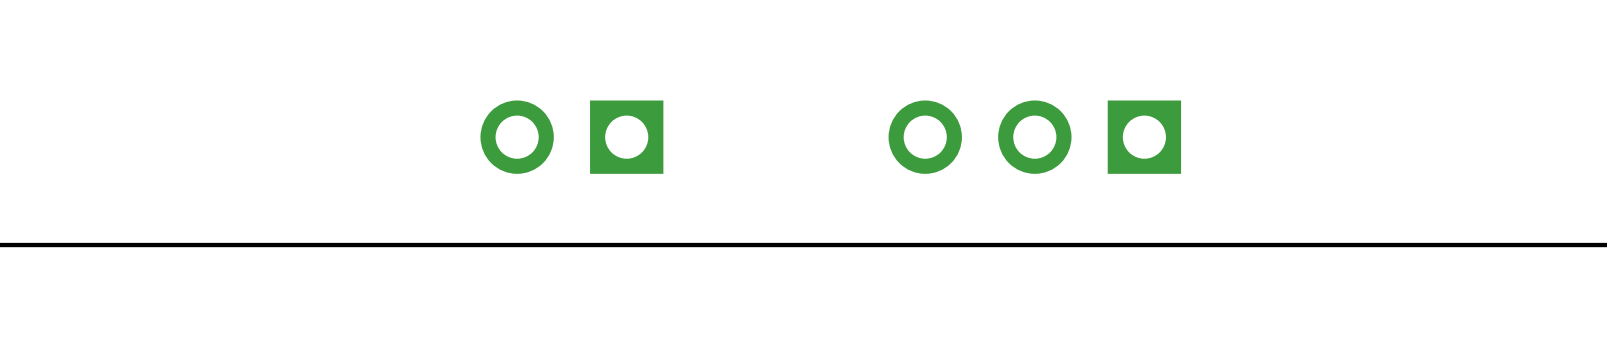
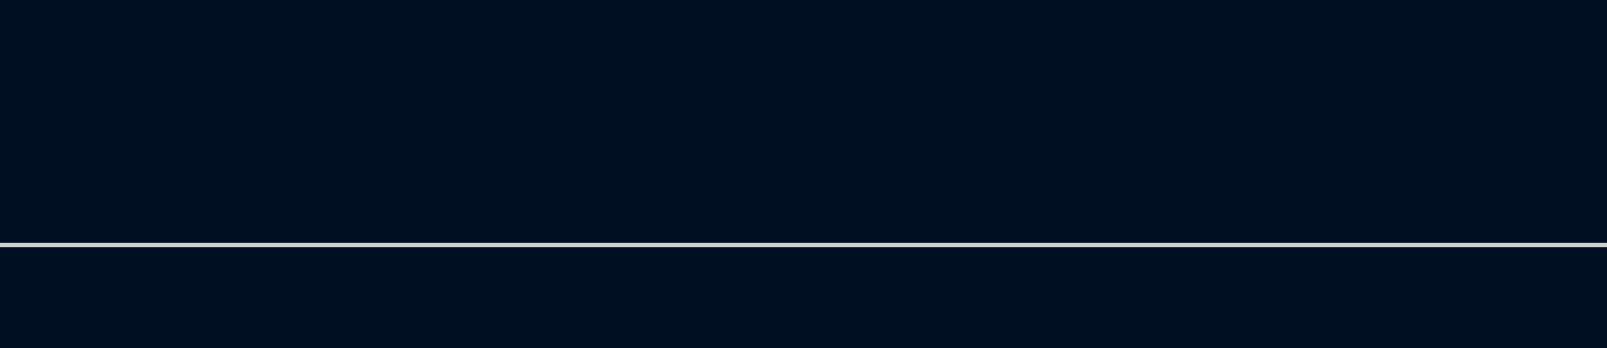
part: (571, 137) -> none
part: (1034, 137) -> none

